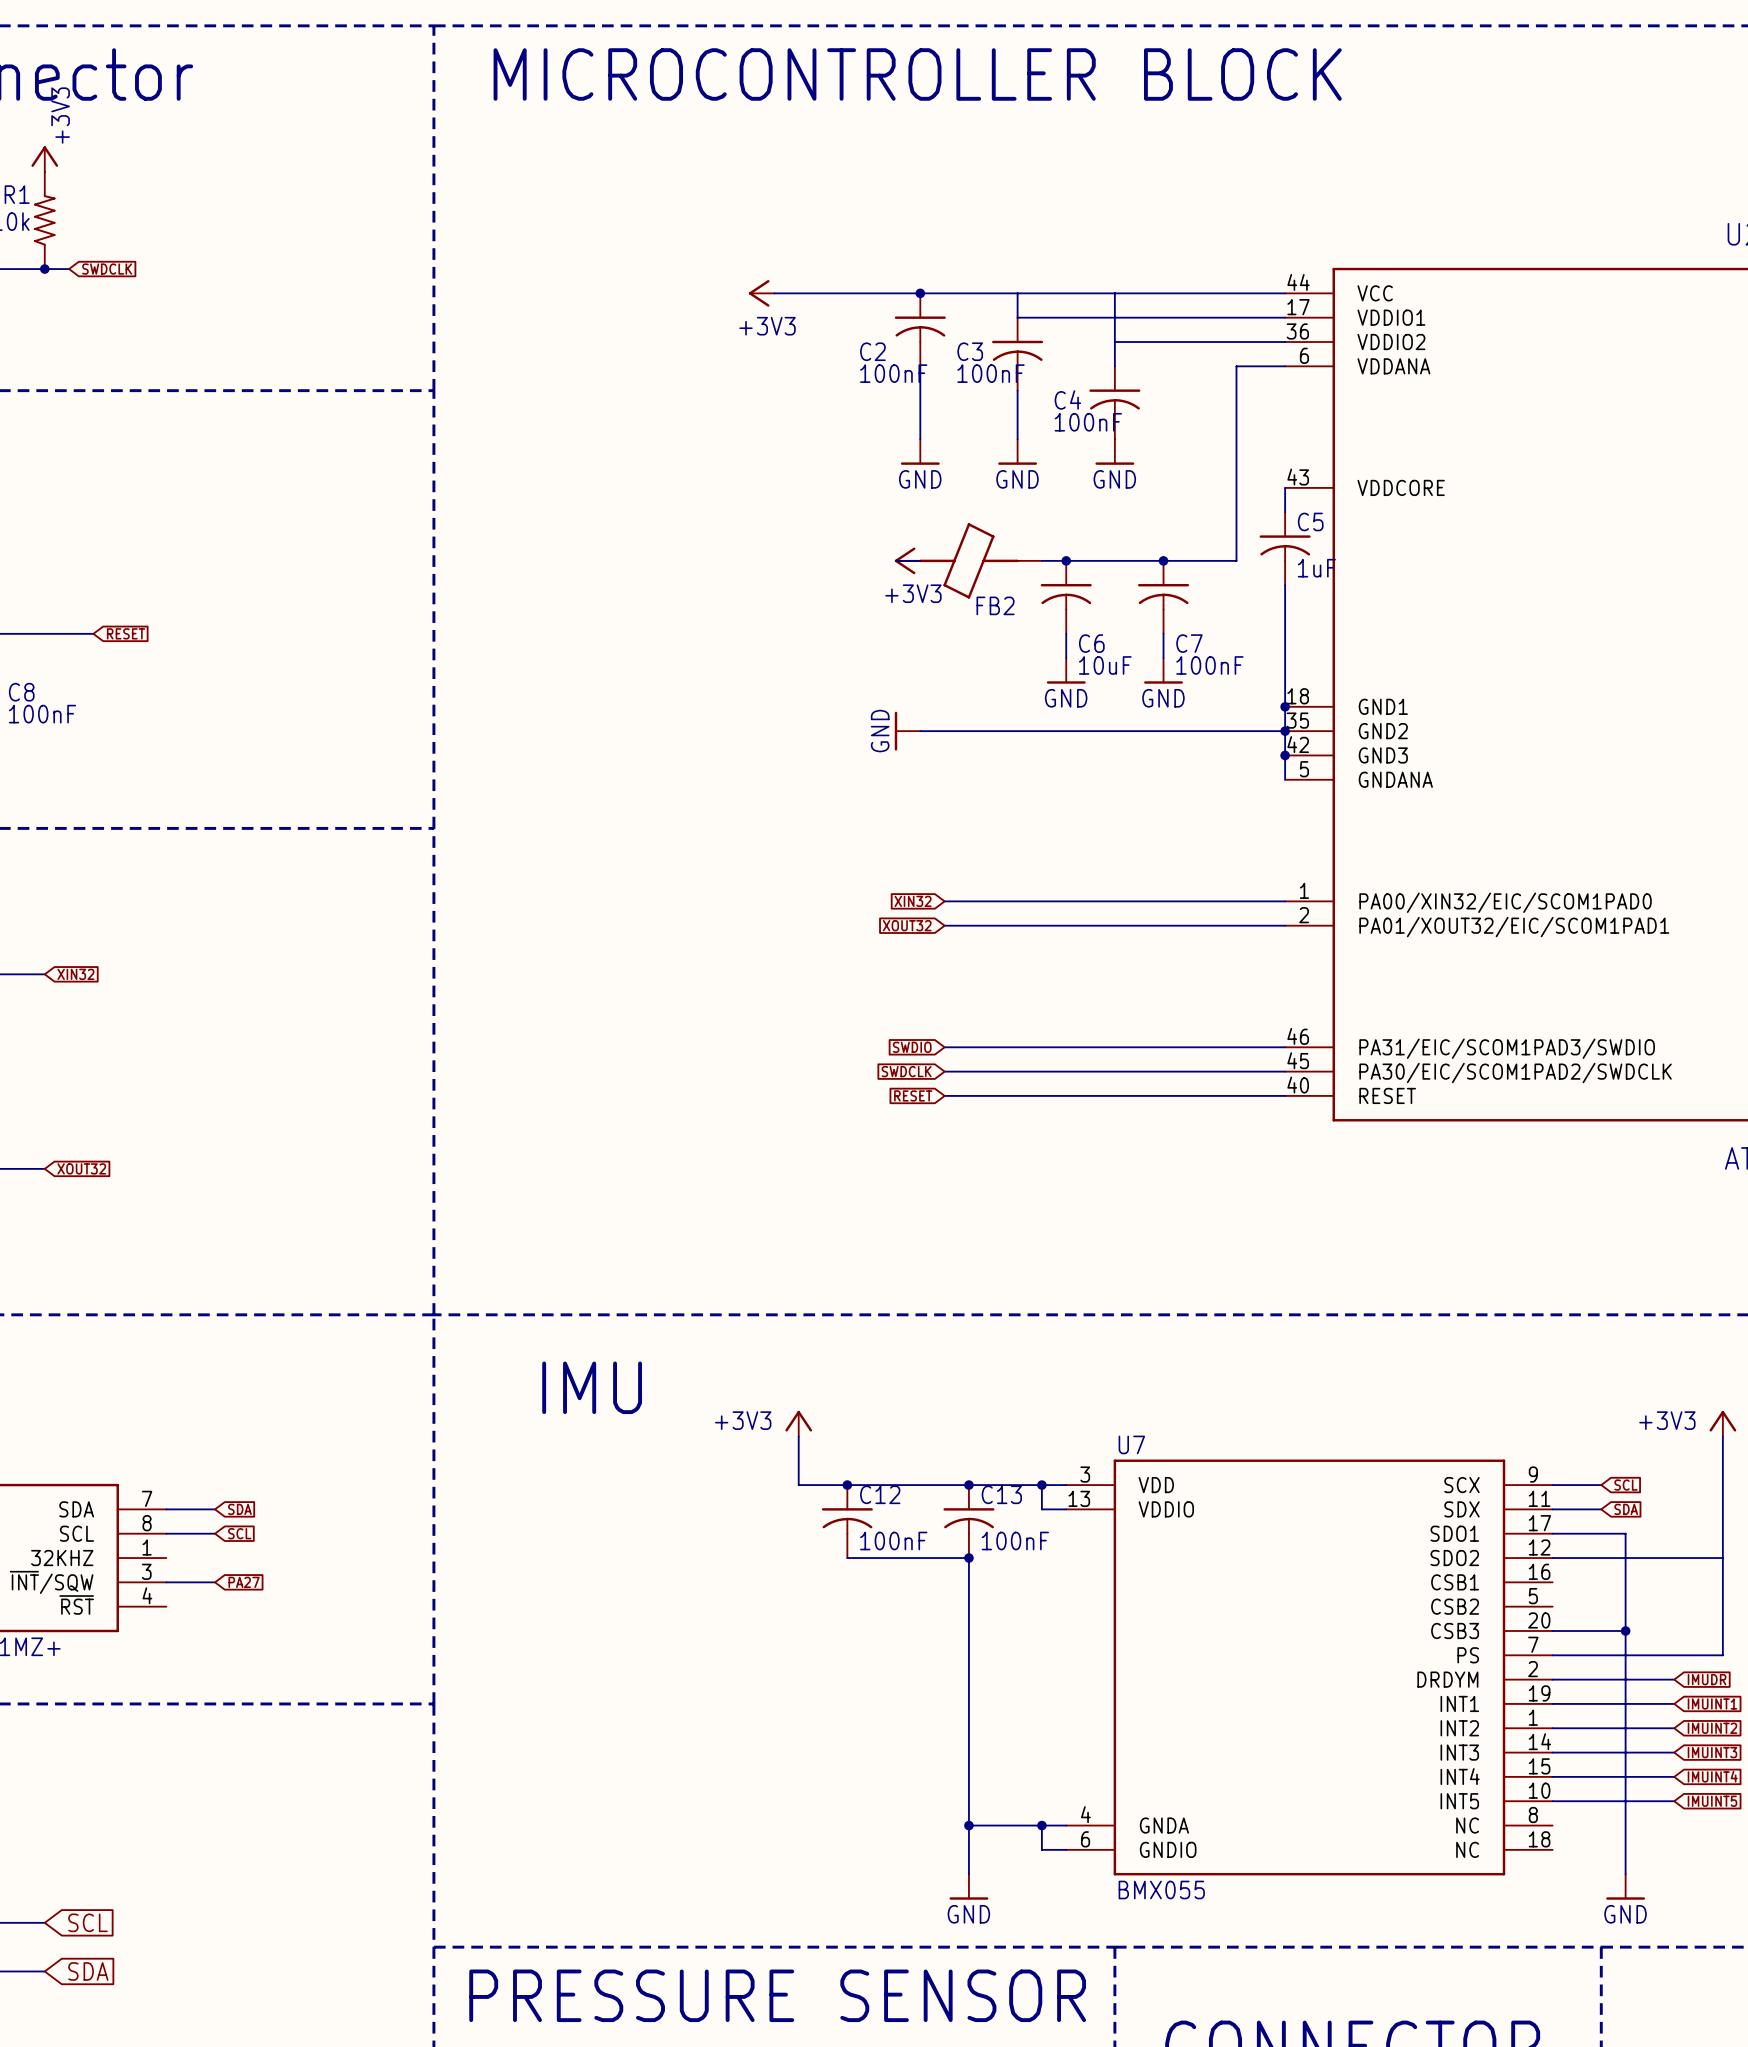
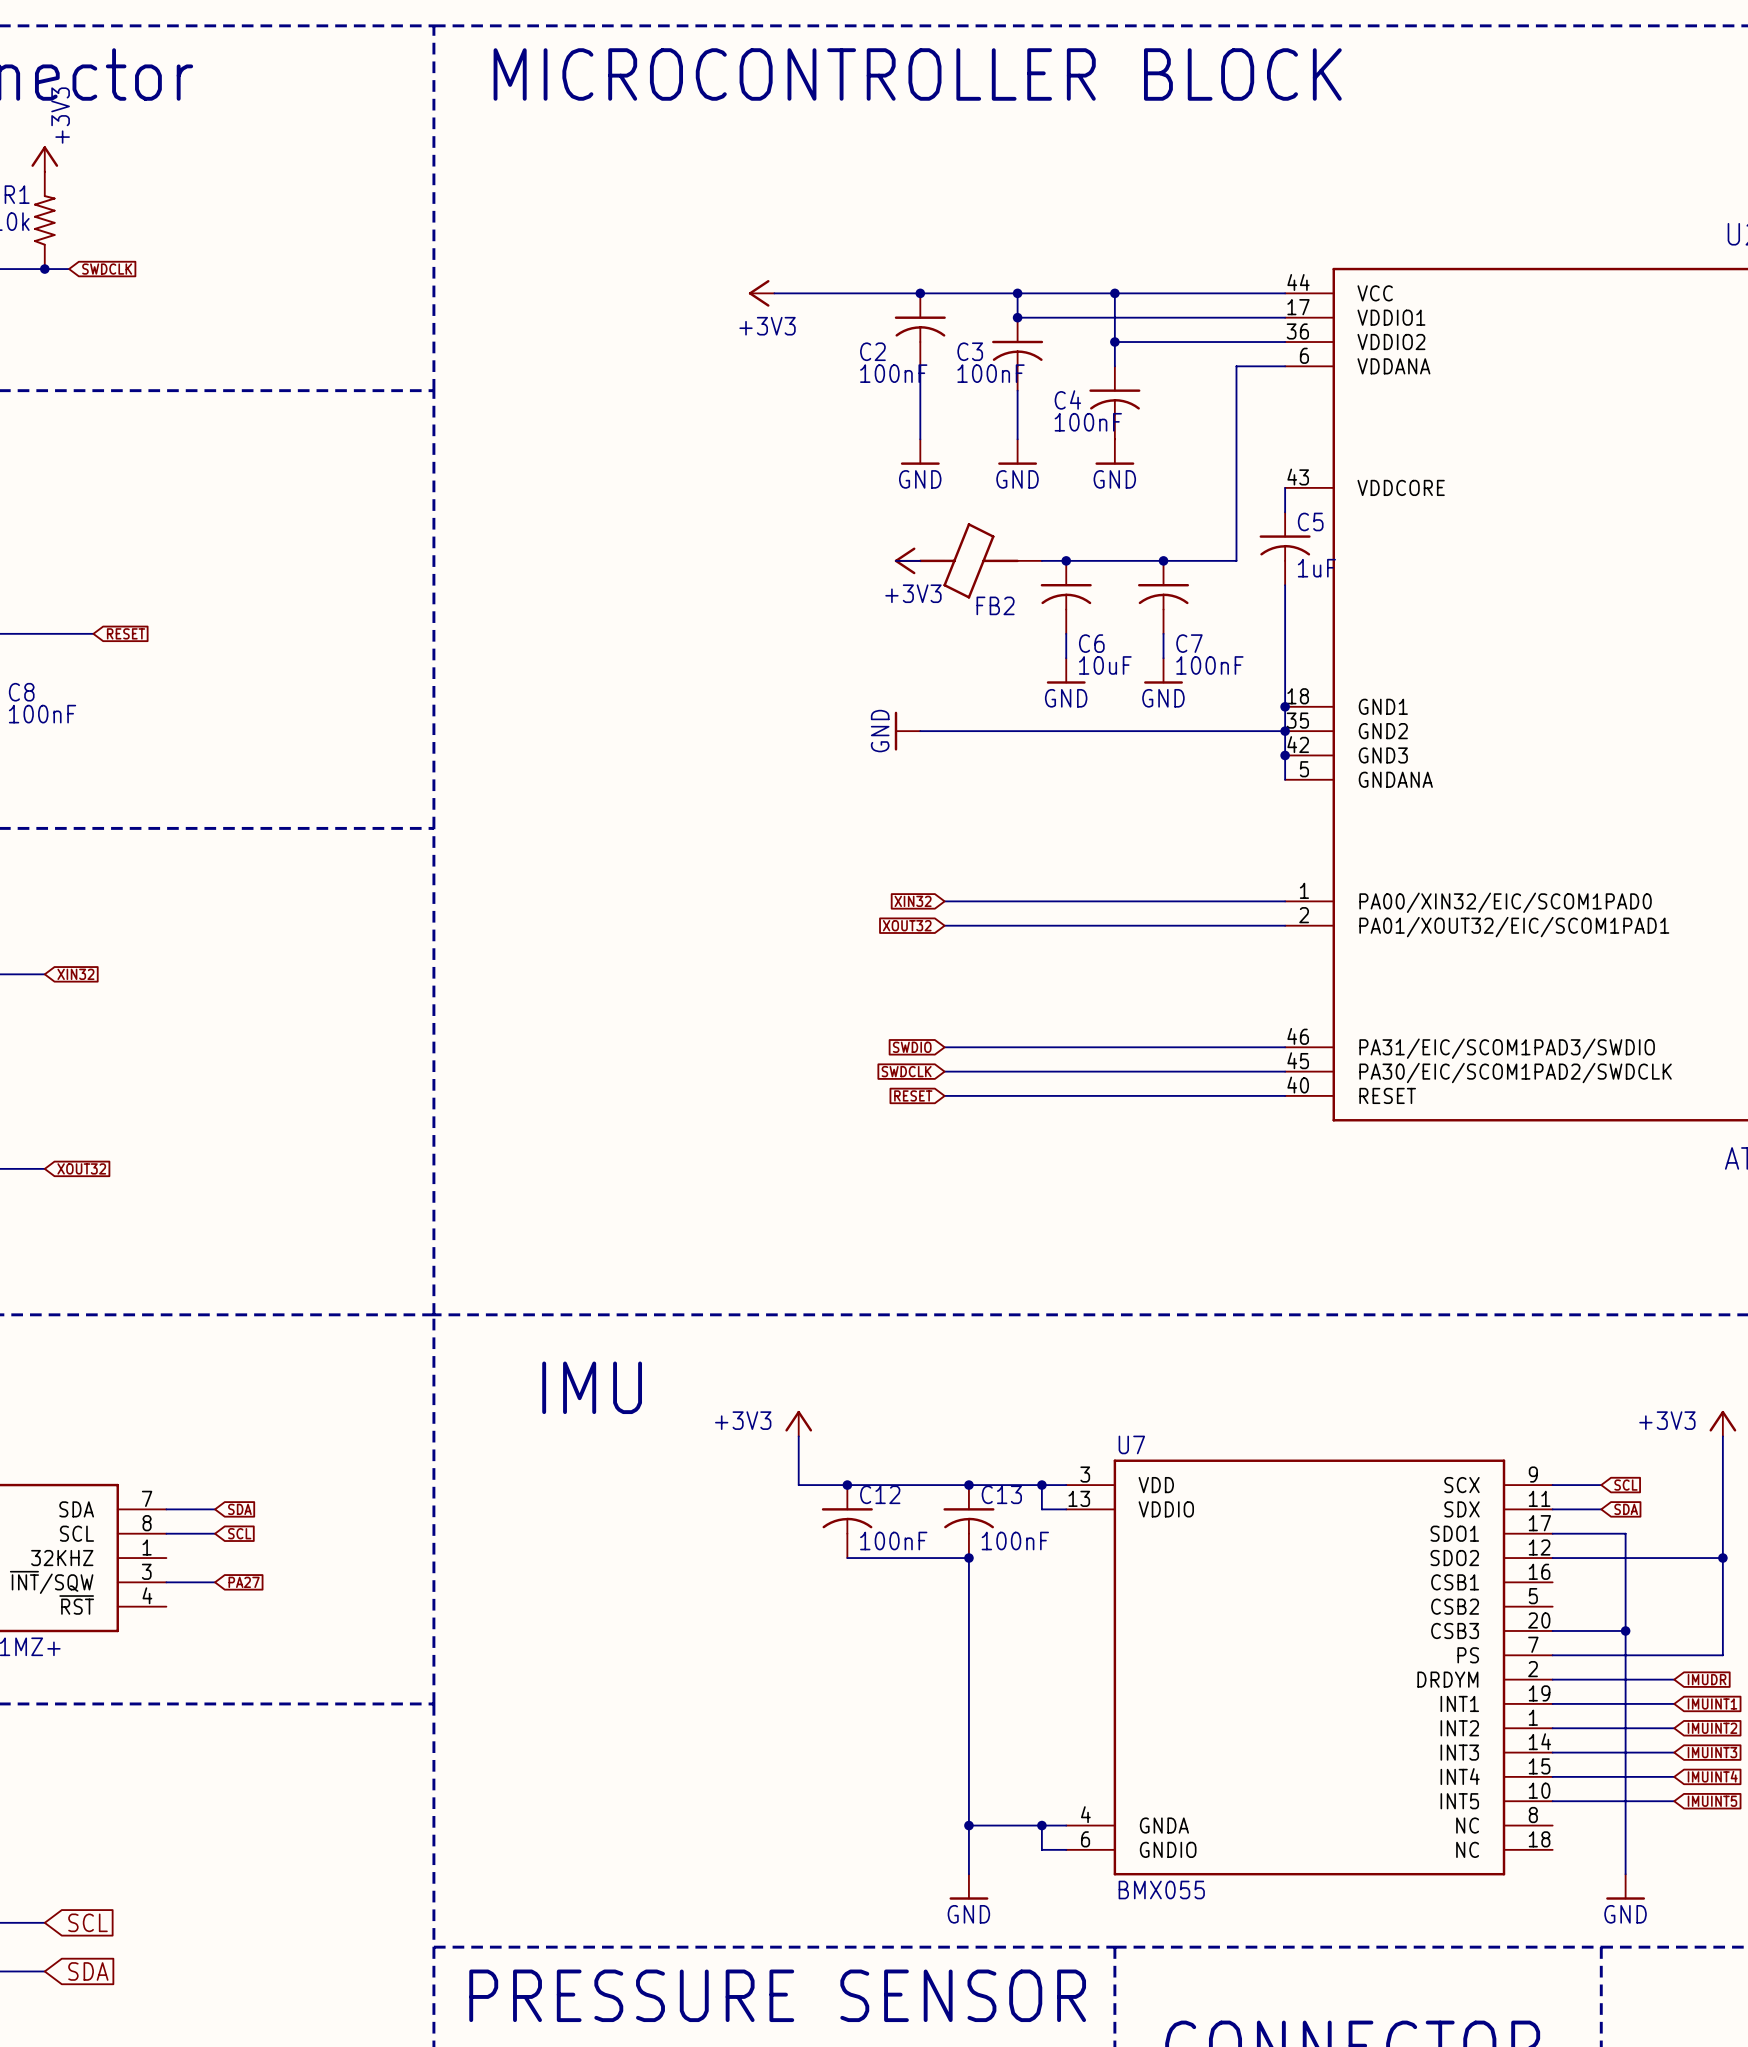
junction: none -> (1017, 293)
junction: none -> (1114, 293)
junction: none -> (1017, 317)
junction: none -> (1114, 342)
junction: none -> (1722, 1558)

